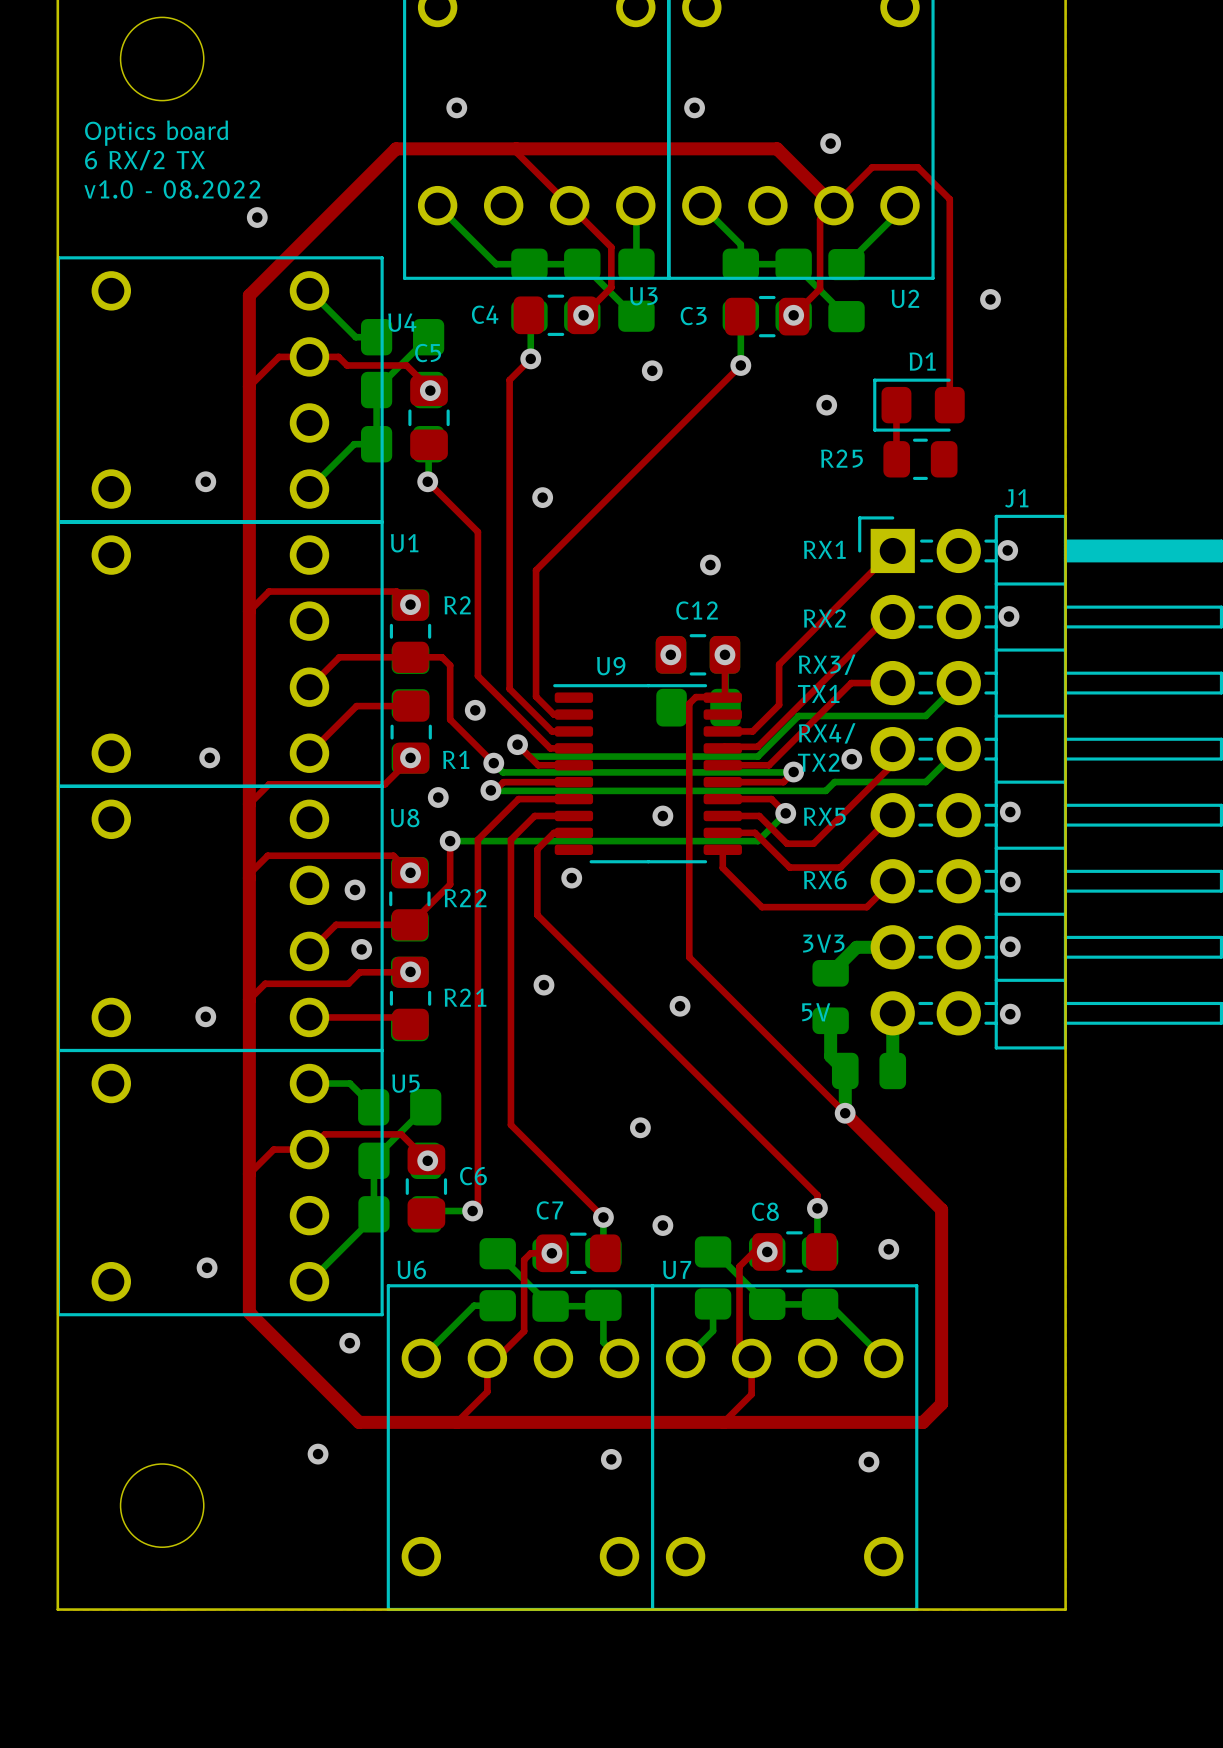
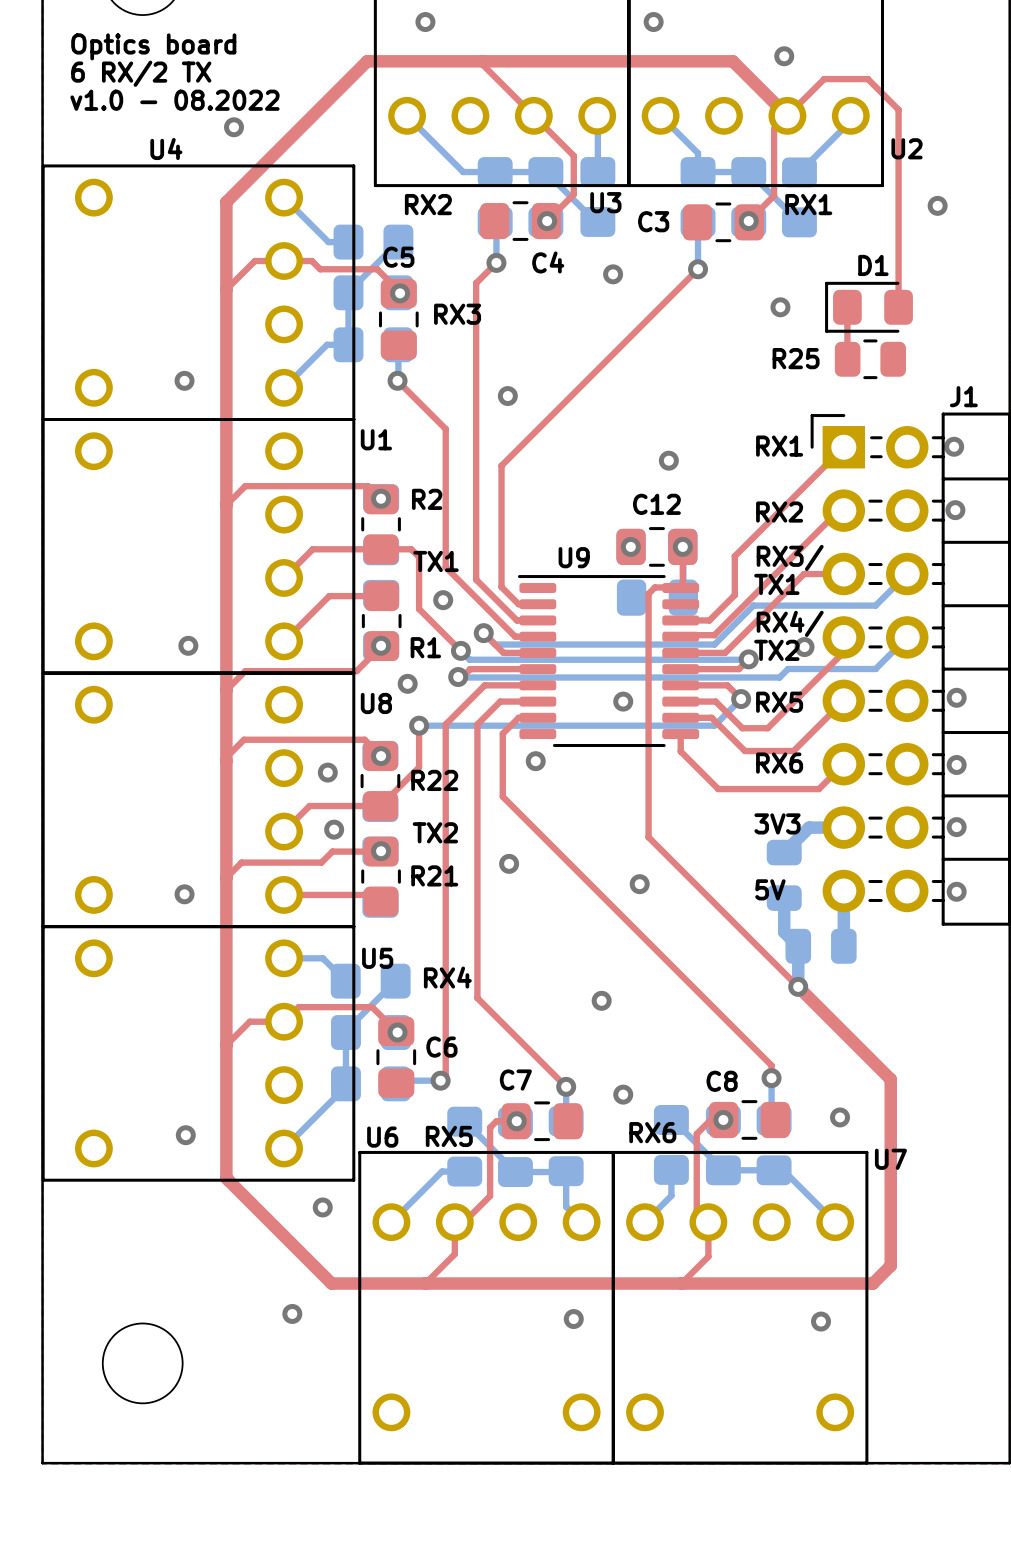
text: none -> RX2 (428, 204)
text: none -> RX1 (808, 204)
U2 name position: U2 (905, 298) -> U2 (907, 148)
C4 name position: C4 (485, 314) -> C4 (548, 262)
U4 name position: U4 (402, 322) -> U4 (166, 149)
text: none -> RX3 (457, 314)
text: none -> TX1 (436, 561)
text: none -> TX2 (435, 832)
text: none -> RX4 (447, 977)
text: none -> RX6 (652, 1132)
text: none -> RX5 (449, 1136)
U7 name position: U7 (677, 1269) -> U7 (890, 1159)

